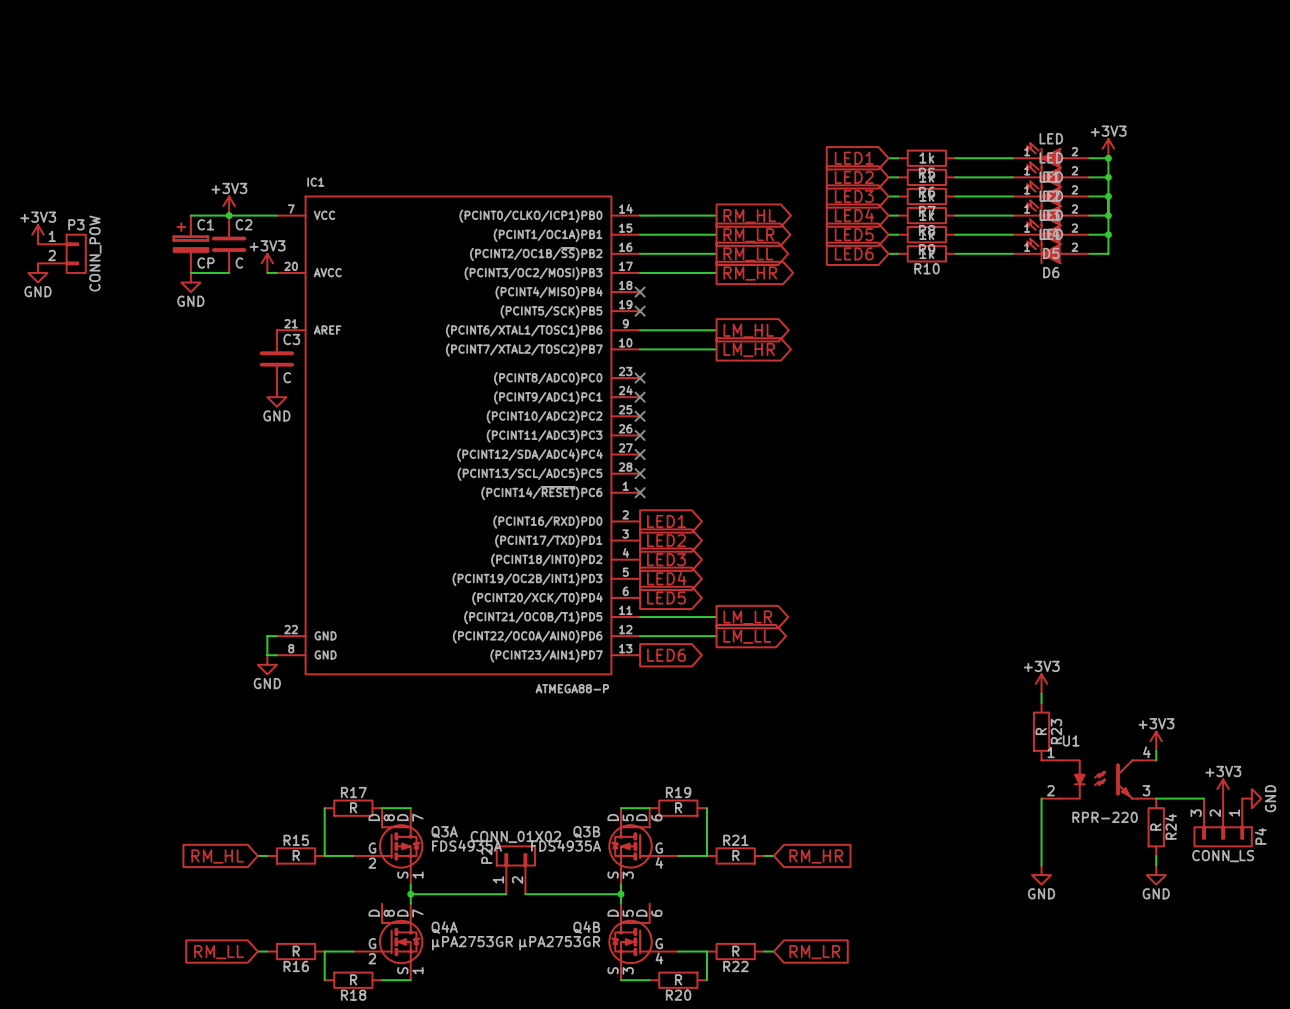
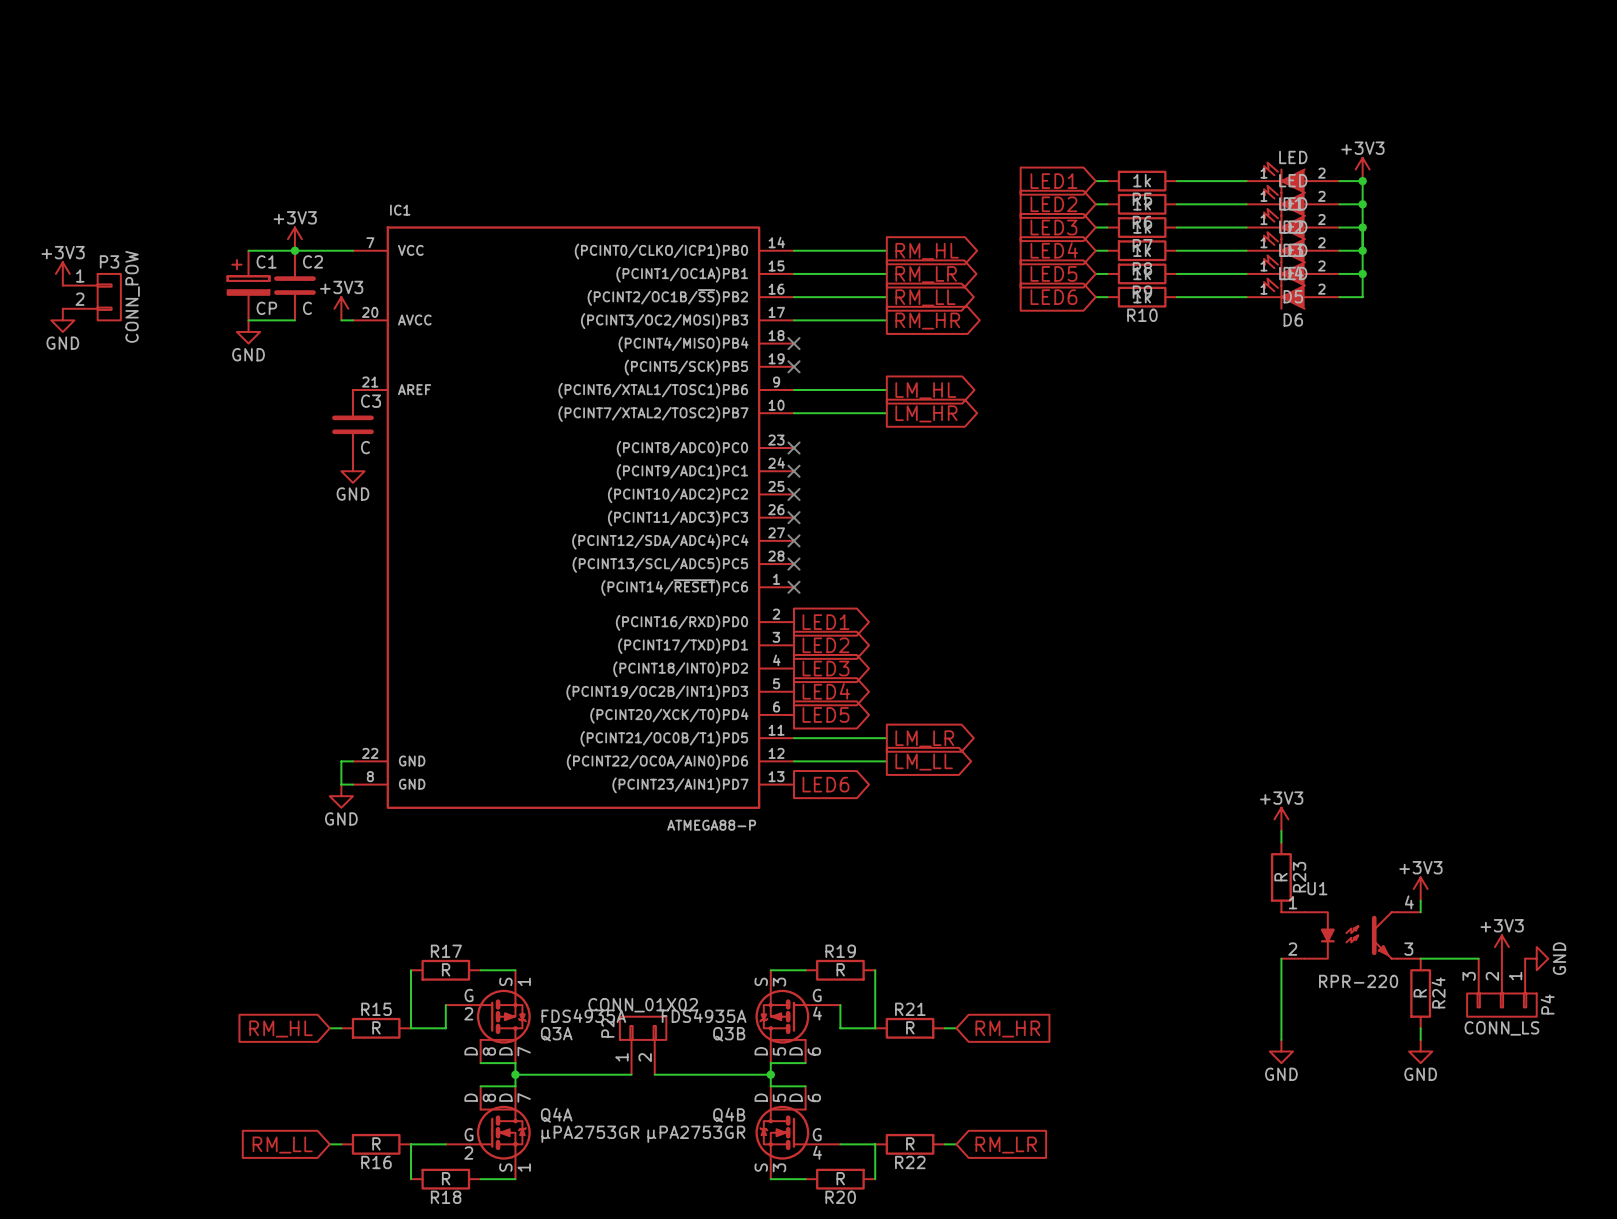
wire: none -> (445, 1005) (445, 1028)
wire: none -> (840, 1005) (840, 1028)
Q3A flip: as is (401, 846) -> up-down (503, 1016)
Q3B flip: as is (630, 846) -> up-down (782, 1016)
wire: none -> (480, 1063) (515, 1063)
wire: none -> (770, 1063) (805, 1063)
wire: none -> (480, 1086) (515, 1086)
wire: none -> (770, 1086) (805, 1086)

